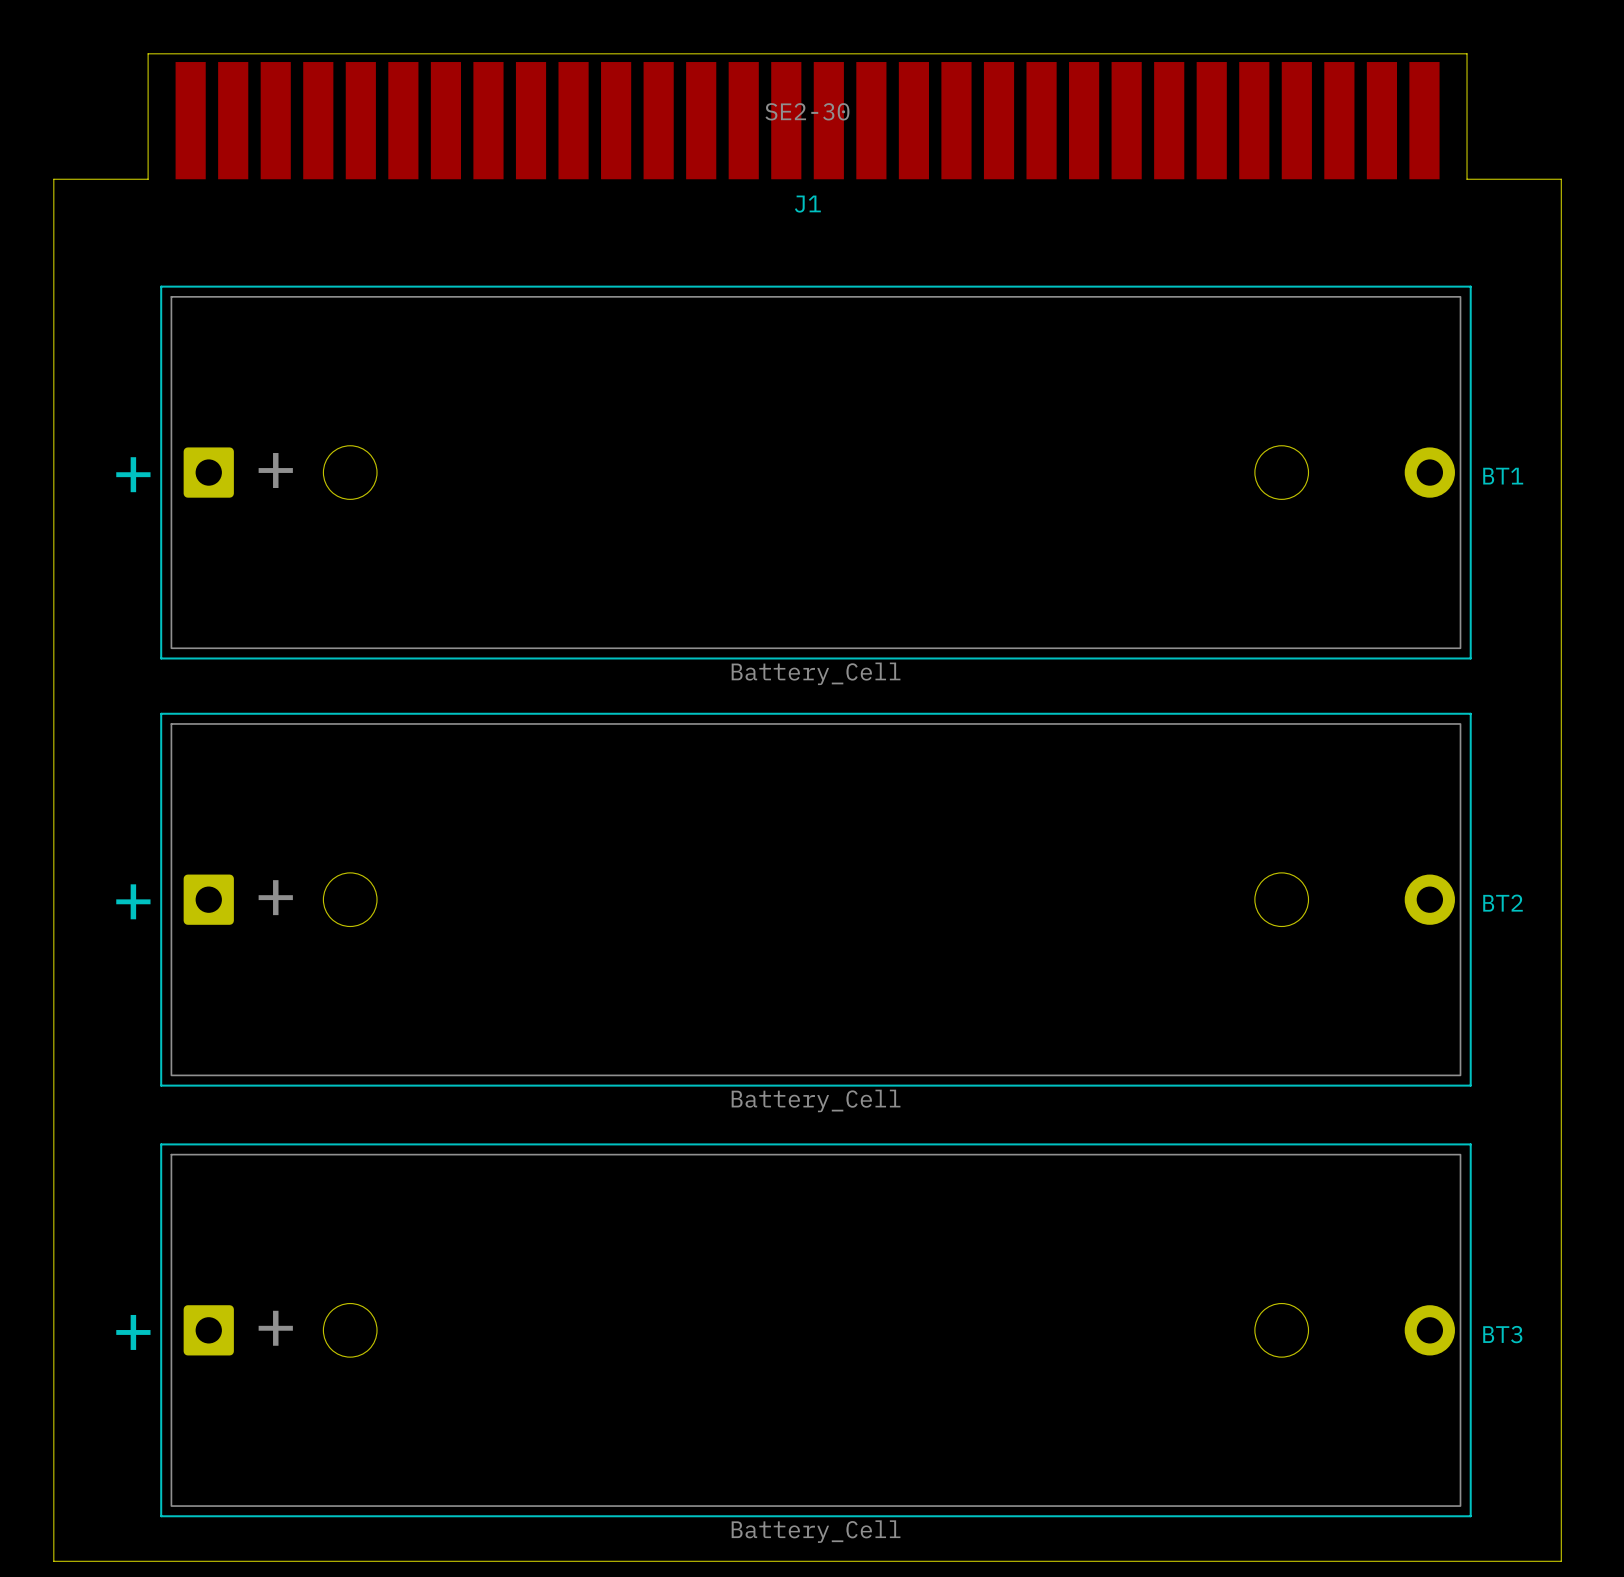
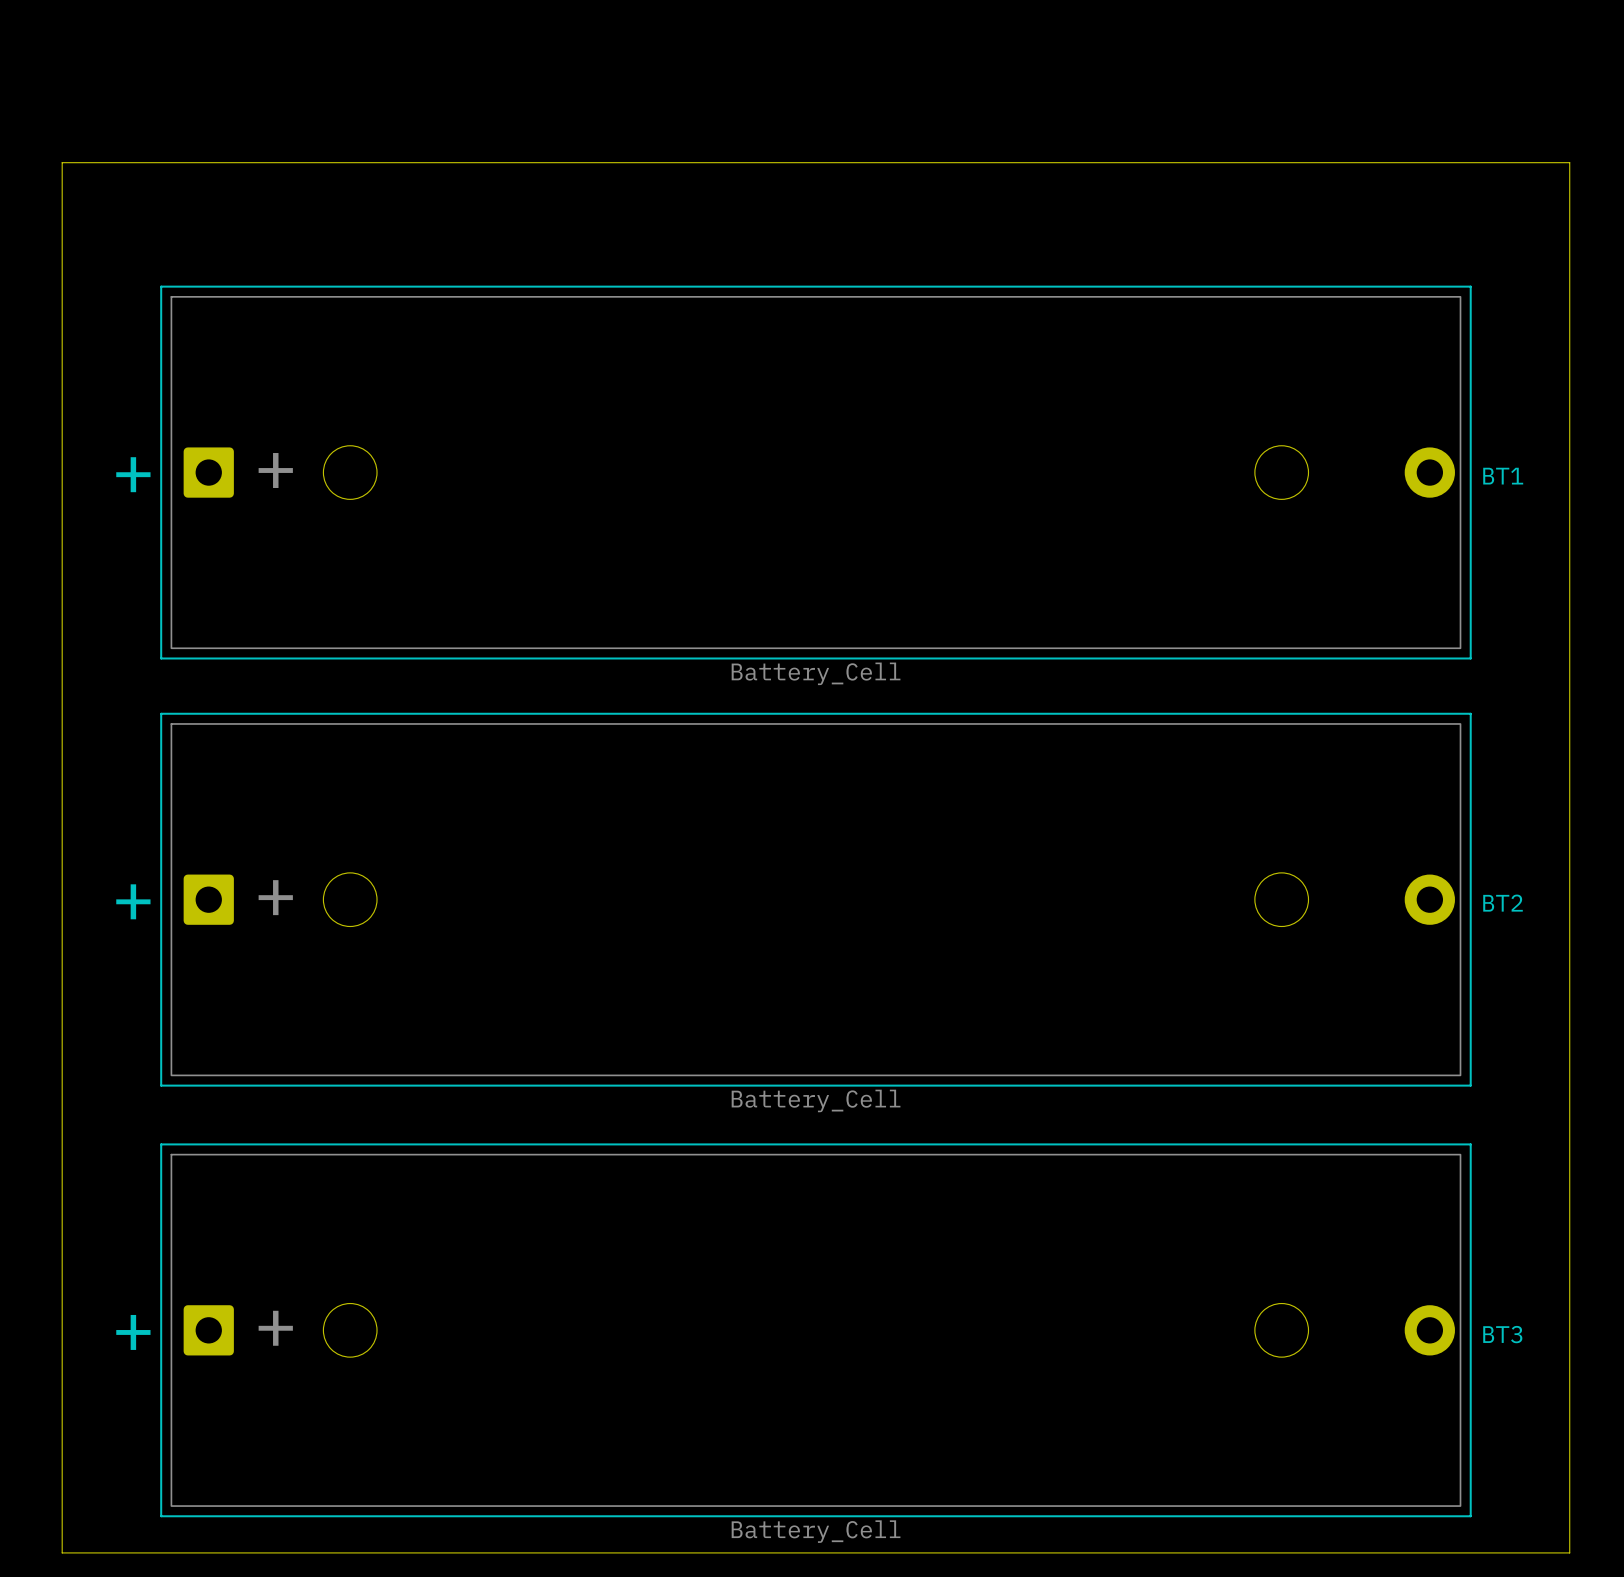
board edge: none -> (62, 162) (1569, 162) (1569, 1552) (62, 1552) (62, 162)
J1: SE2-30 (807, 807) -> none

